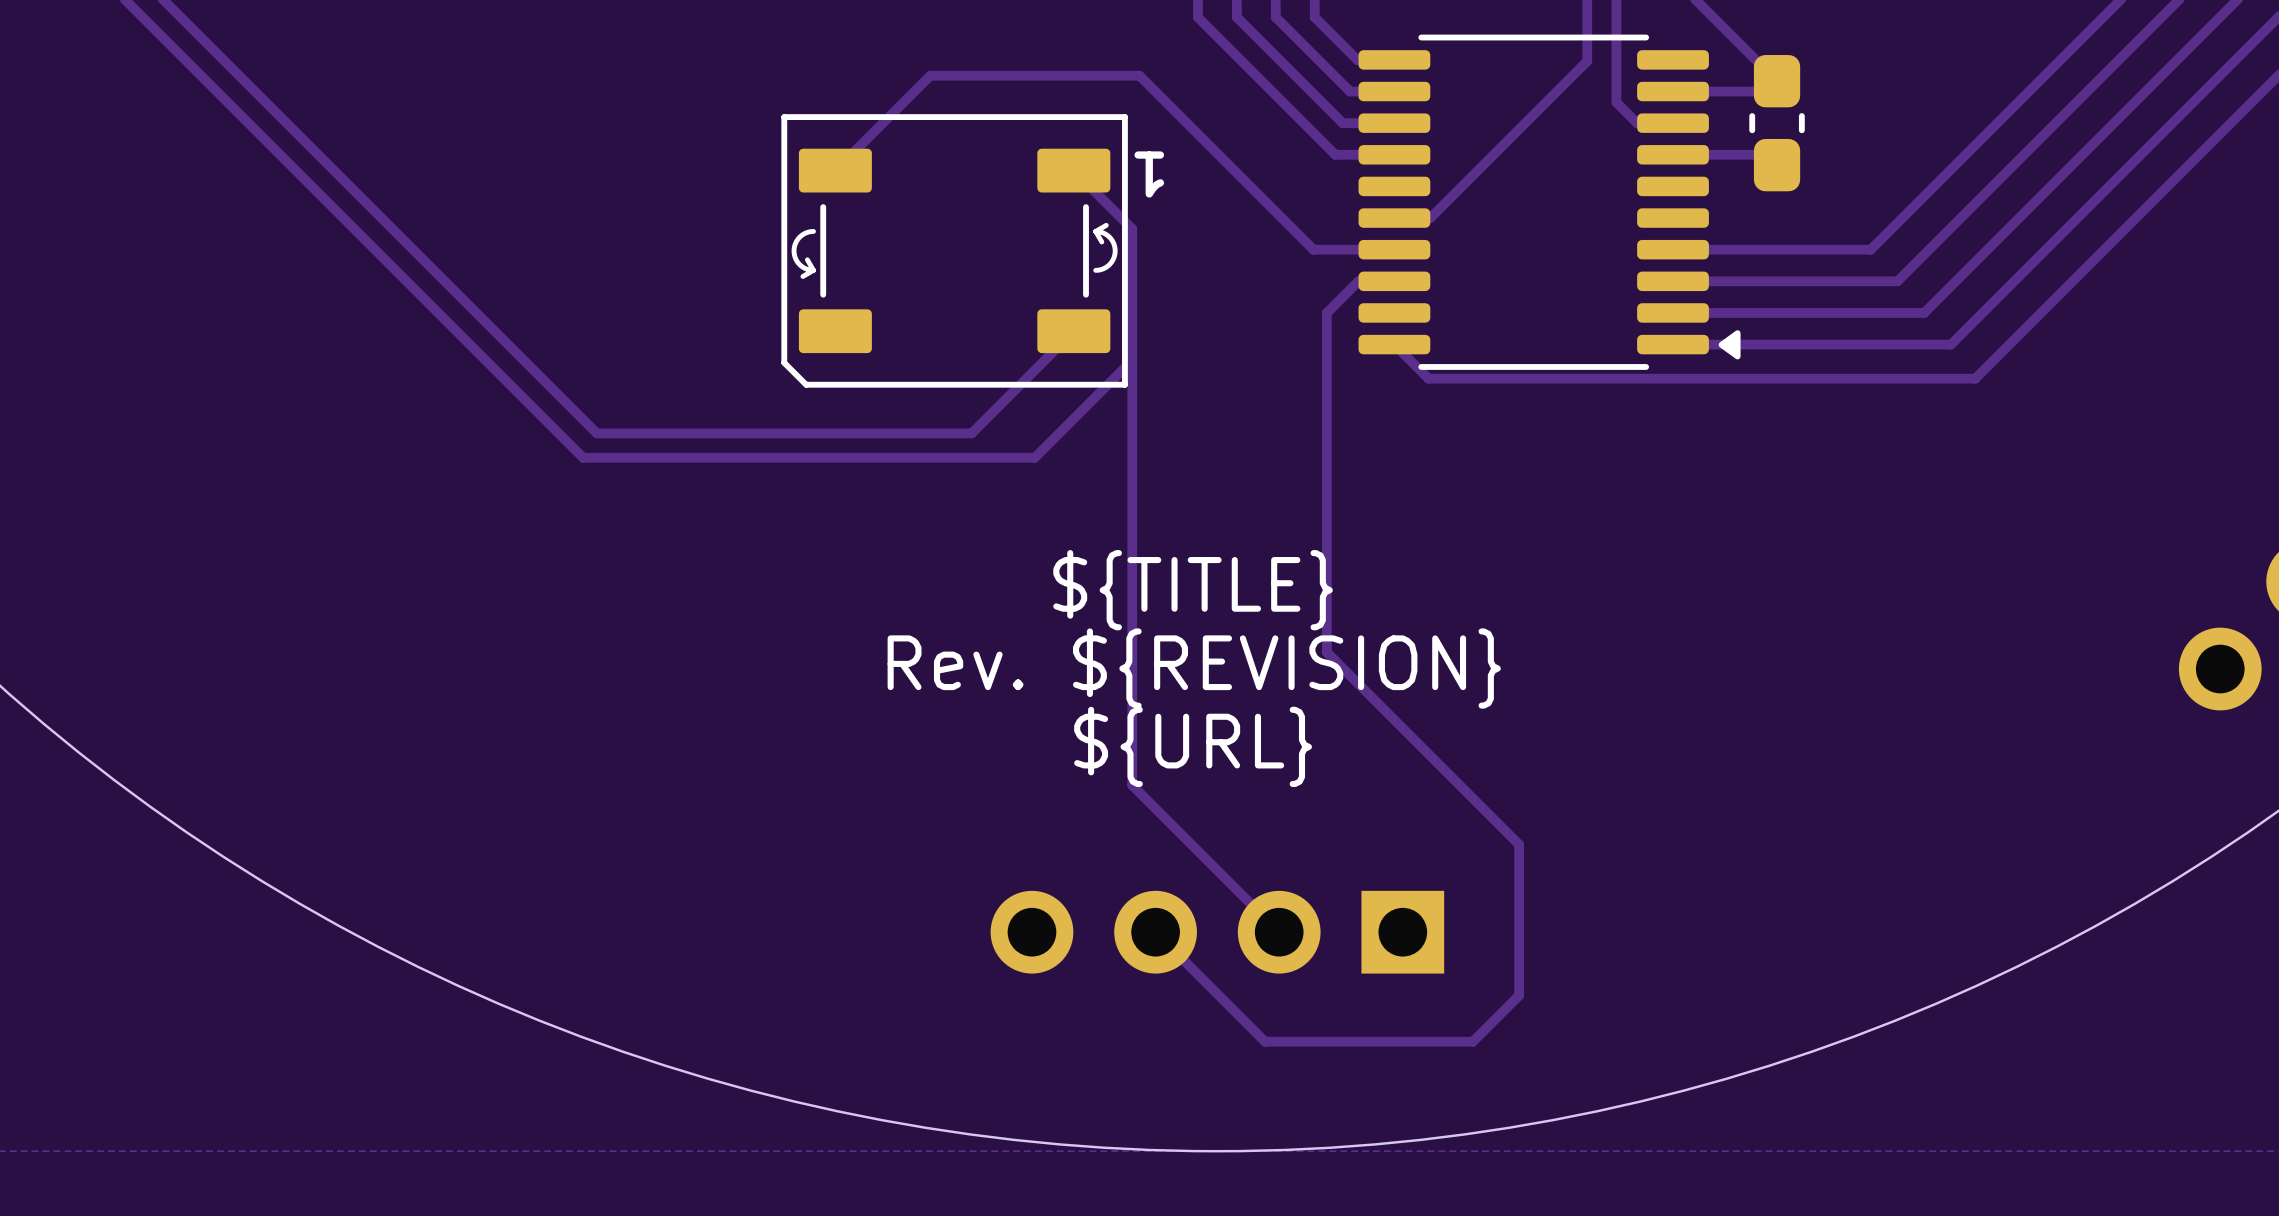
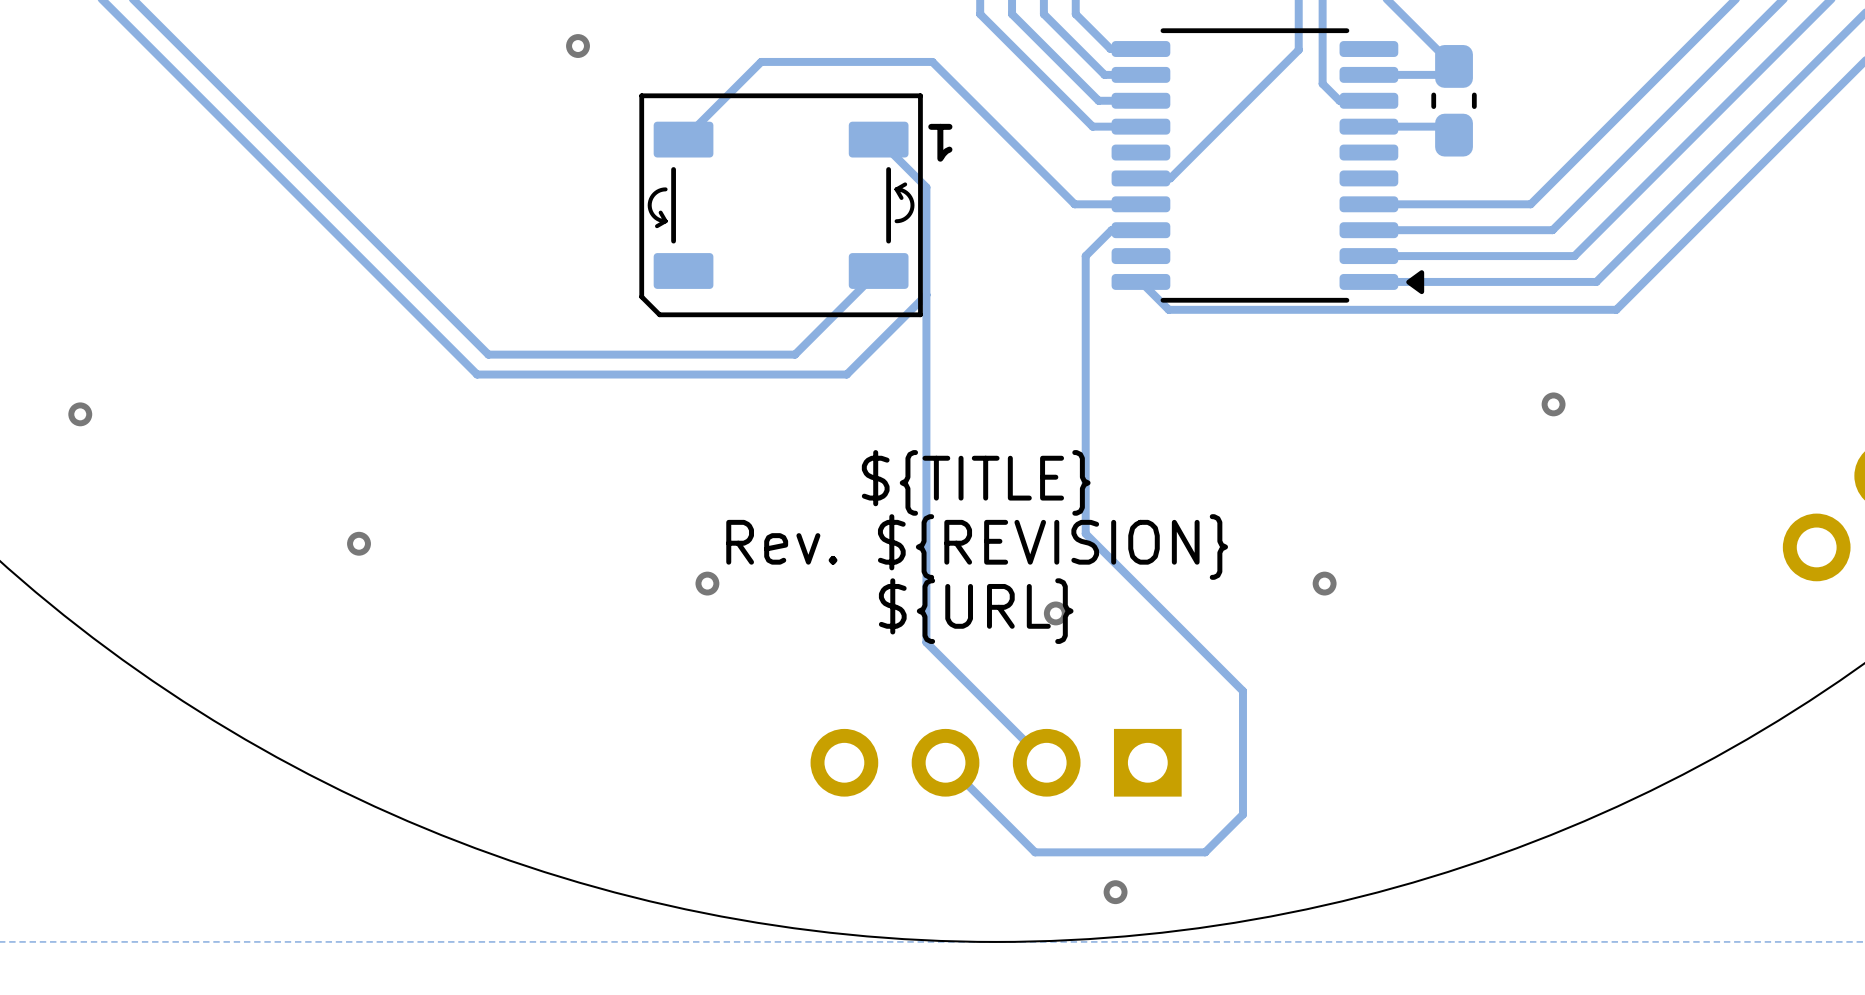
via: none -> (578, 46)
via: none -> (1553, 404)
via: none -> (80, 414)
via: none -> (359, 543)
via: none -> (707, 583)
via: none -> (1324, 583)
via: none -> (1055, 613)
via: none -> (1115, 892)

